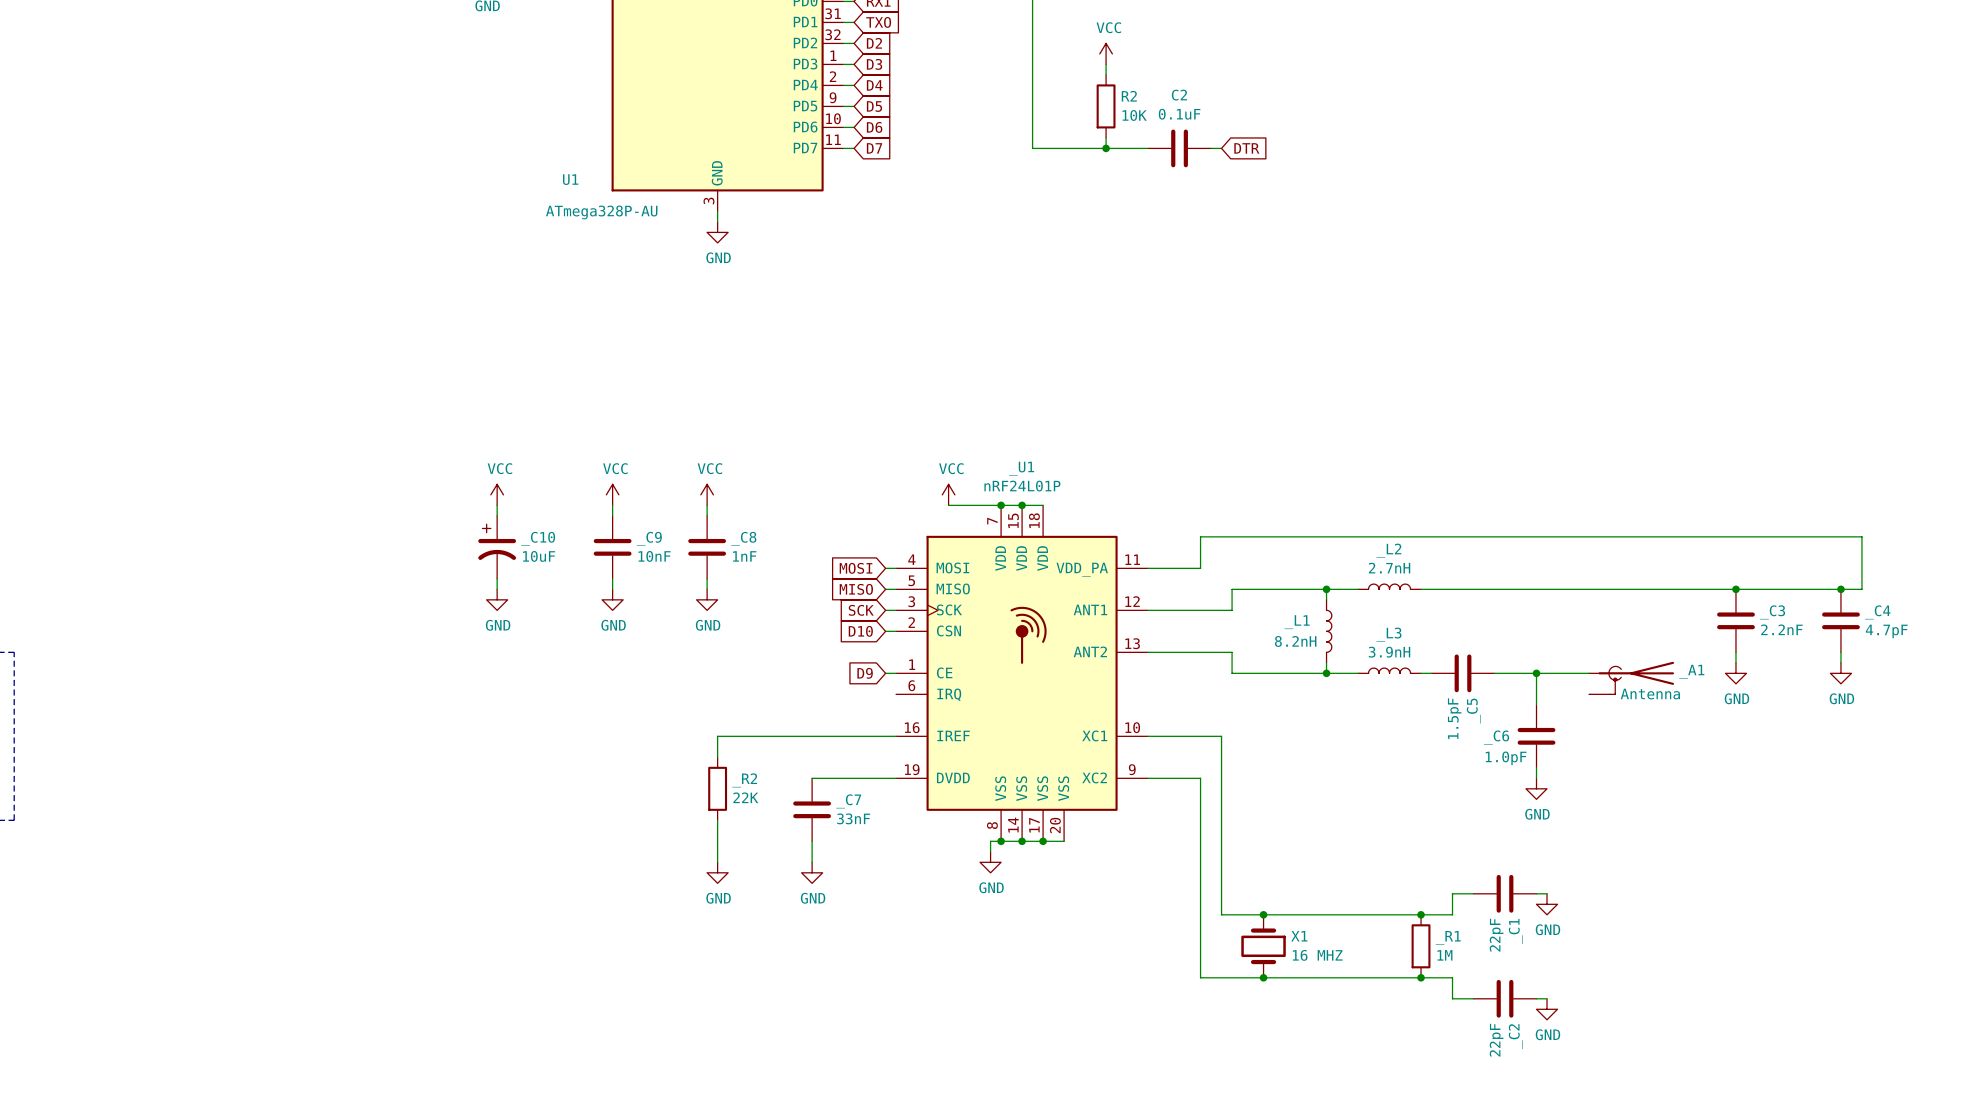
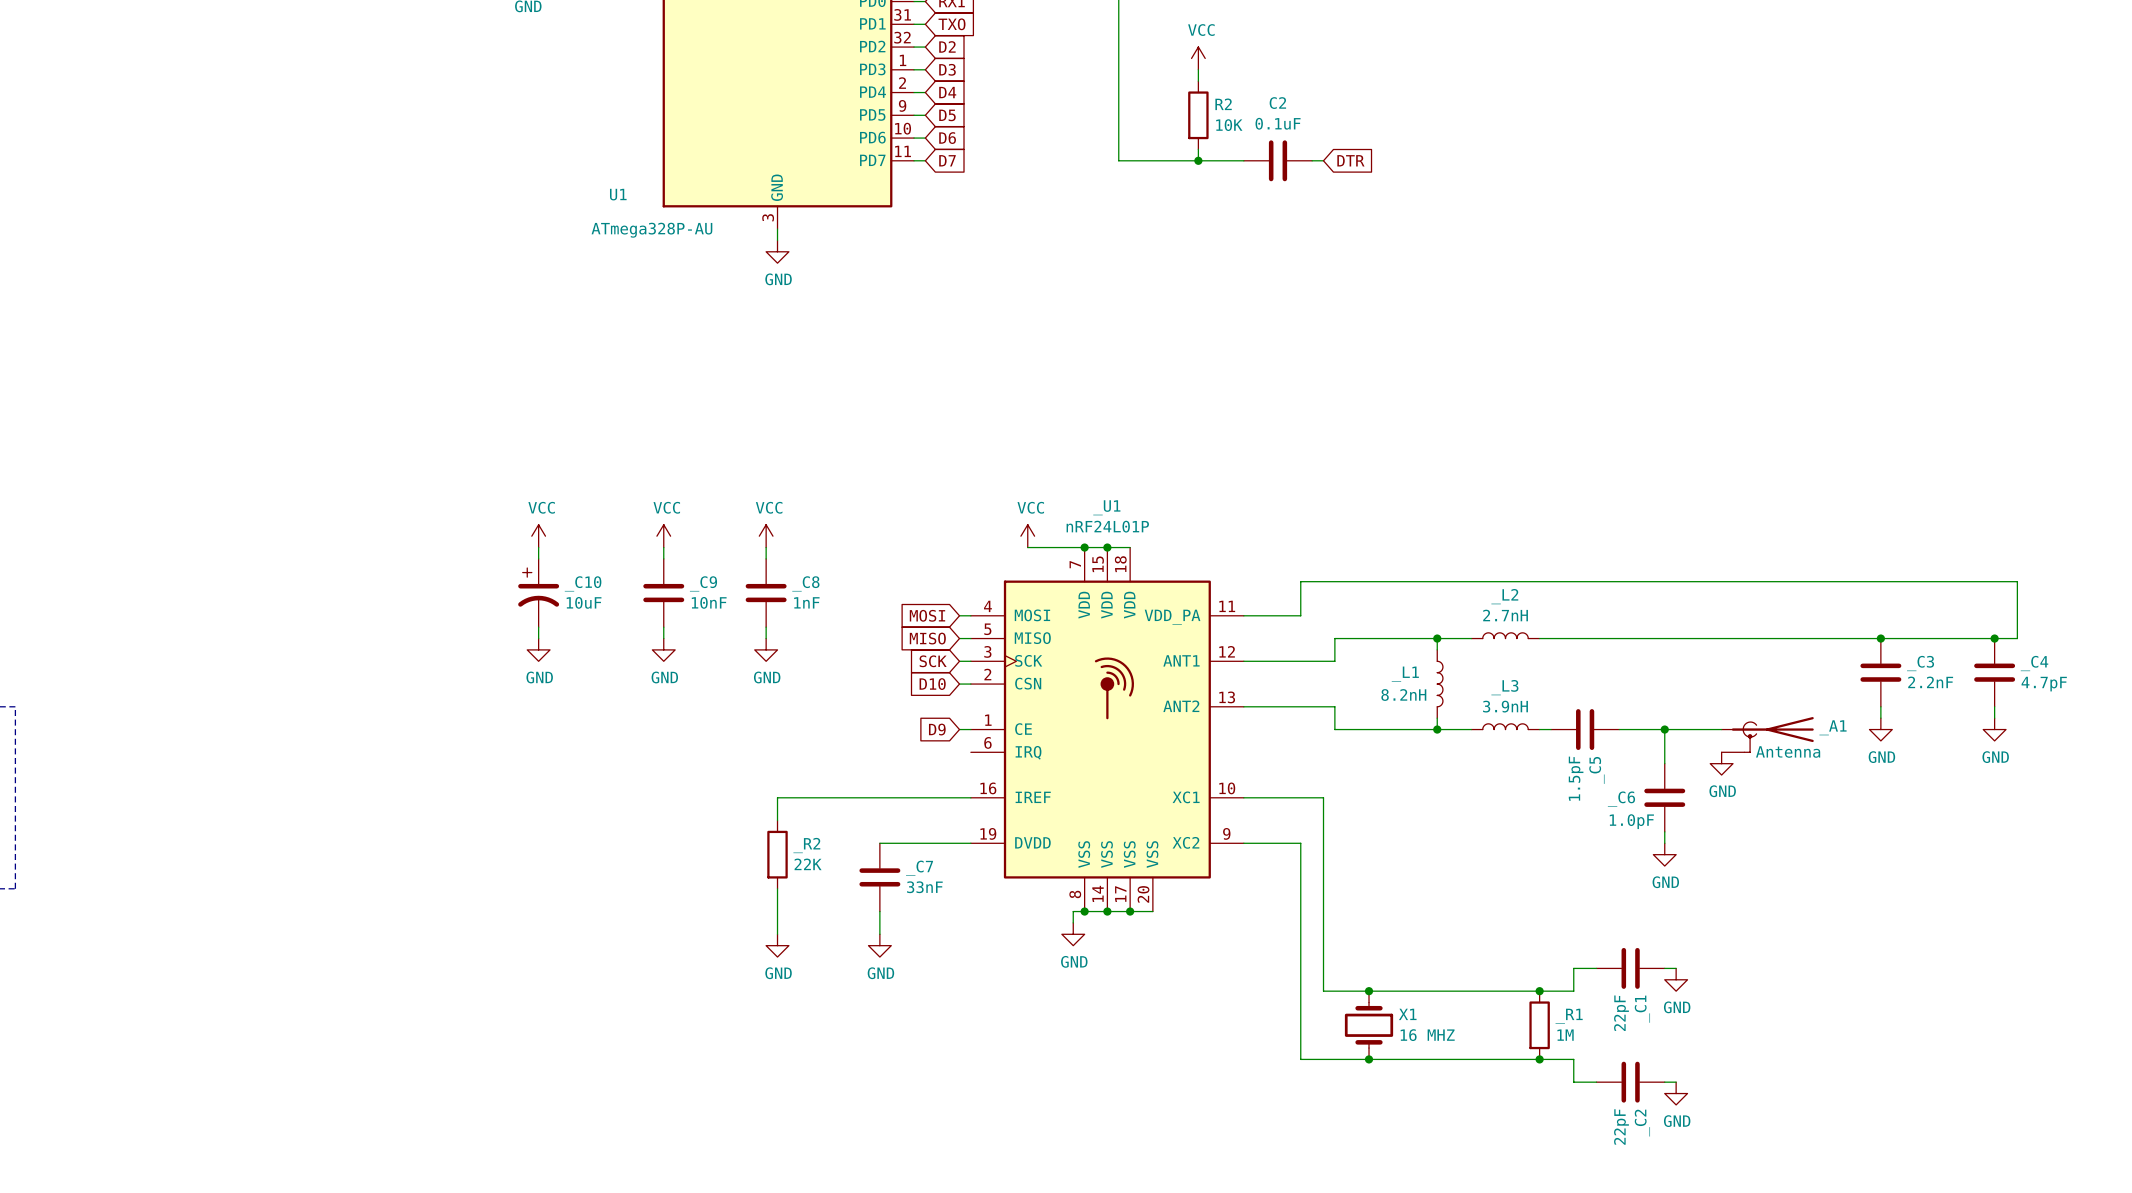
power symbol: none -> GND (1721, 763)

